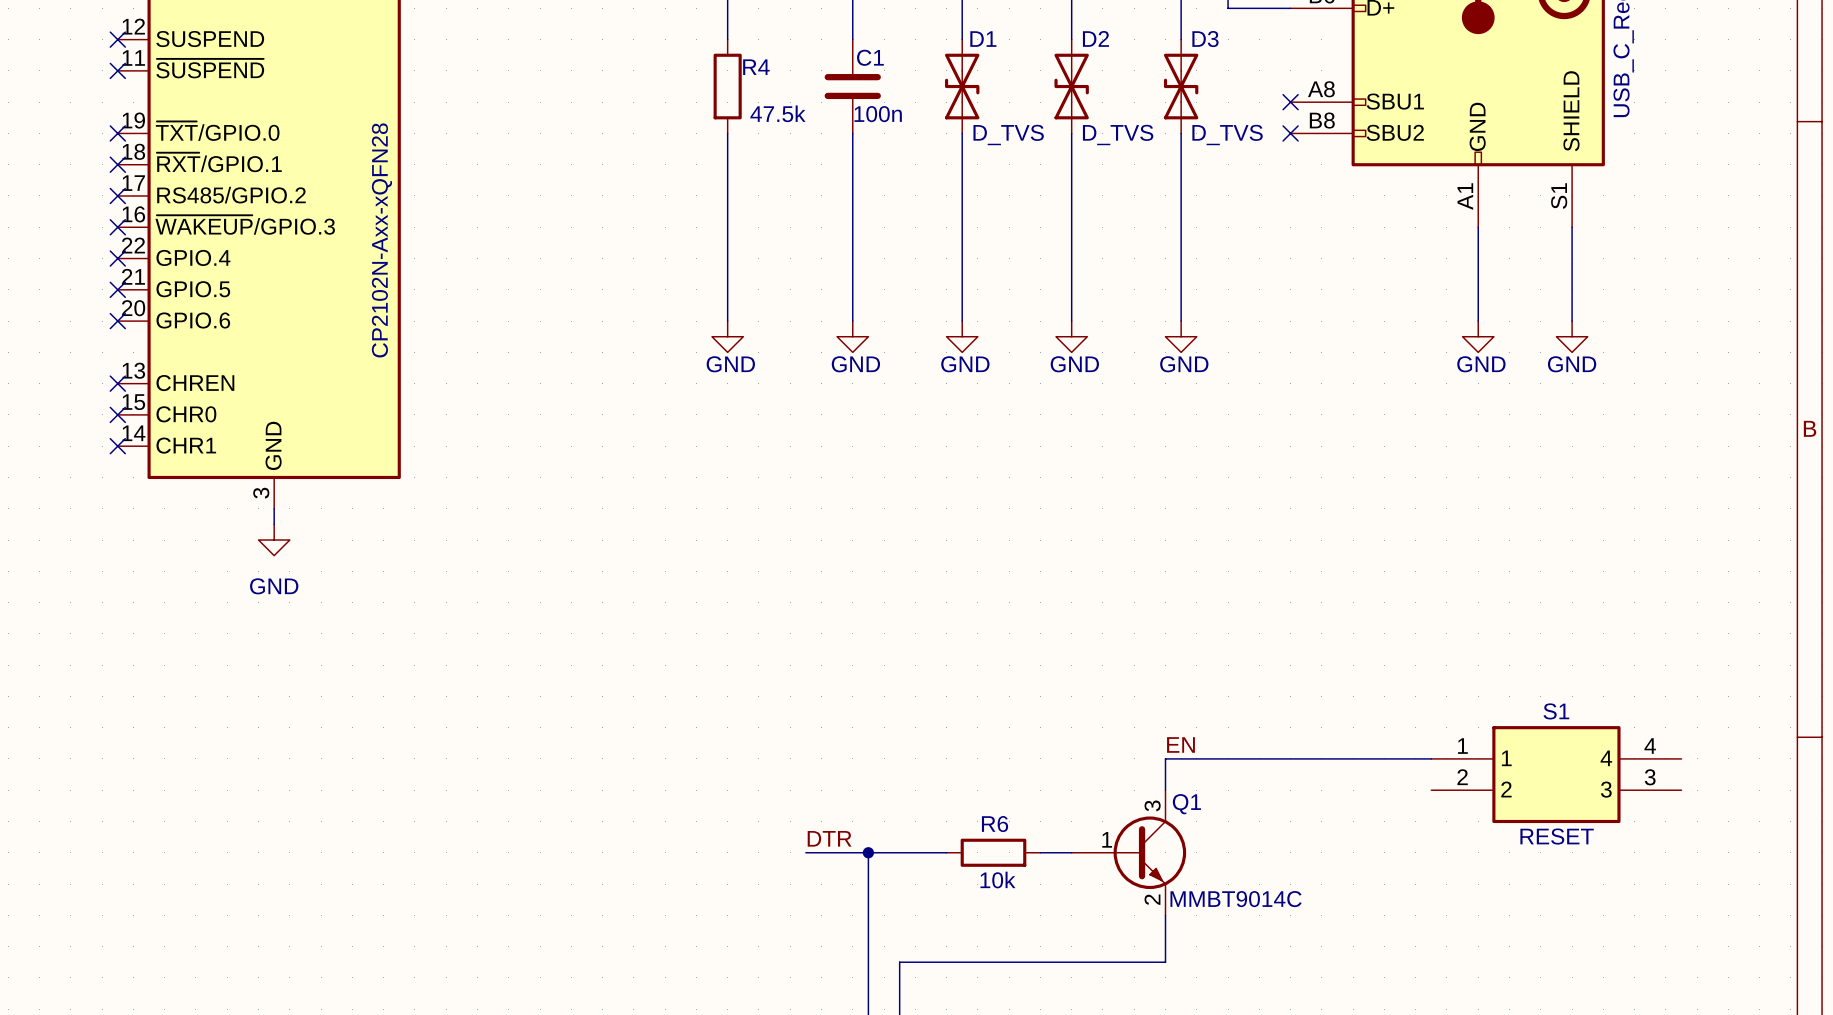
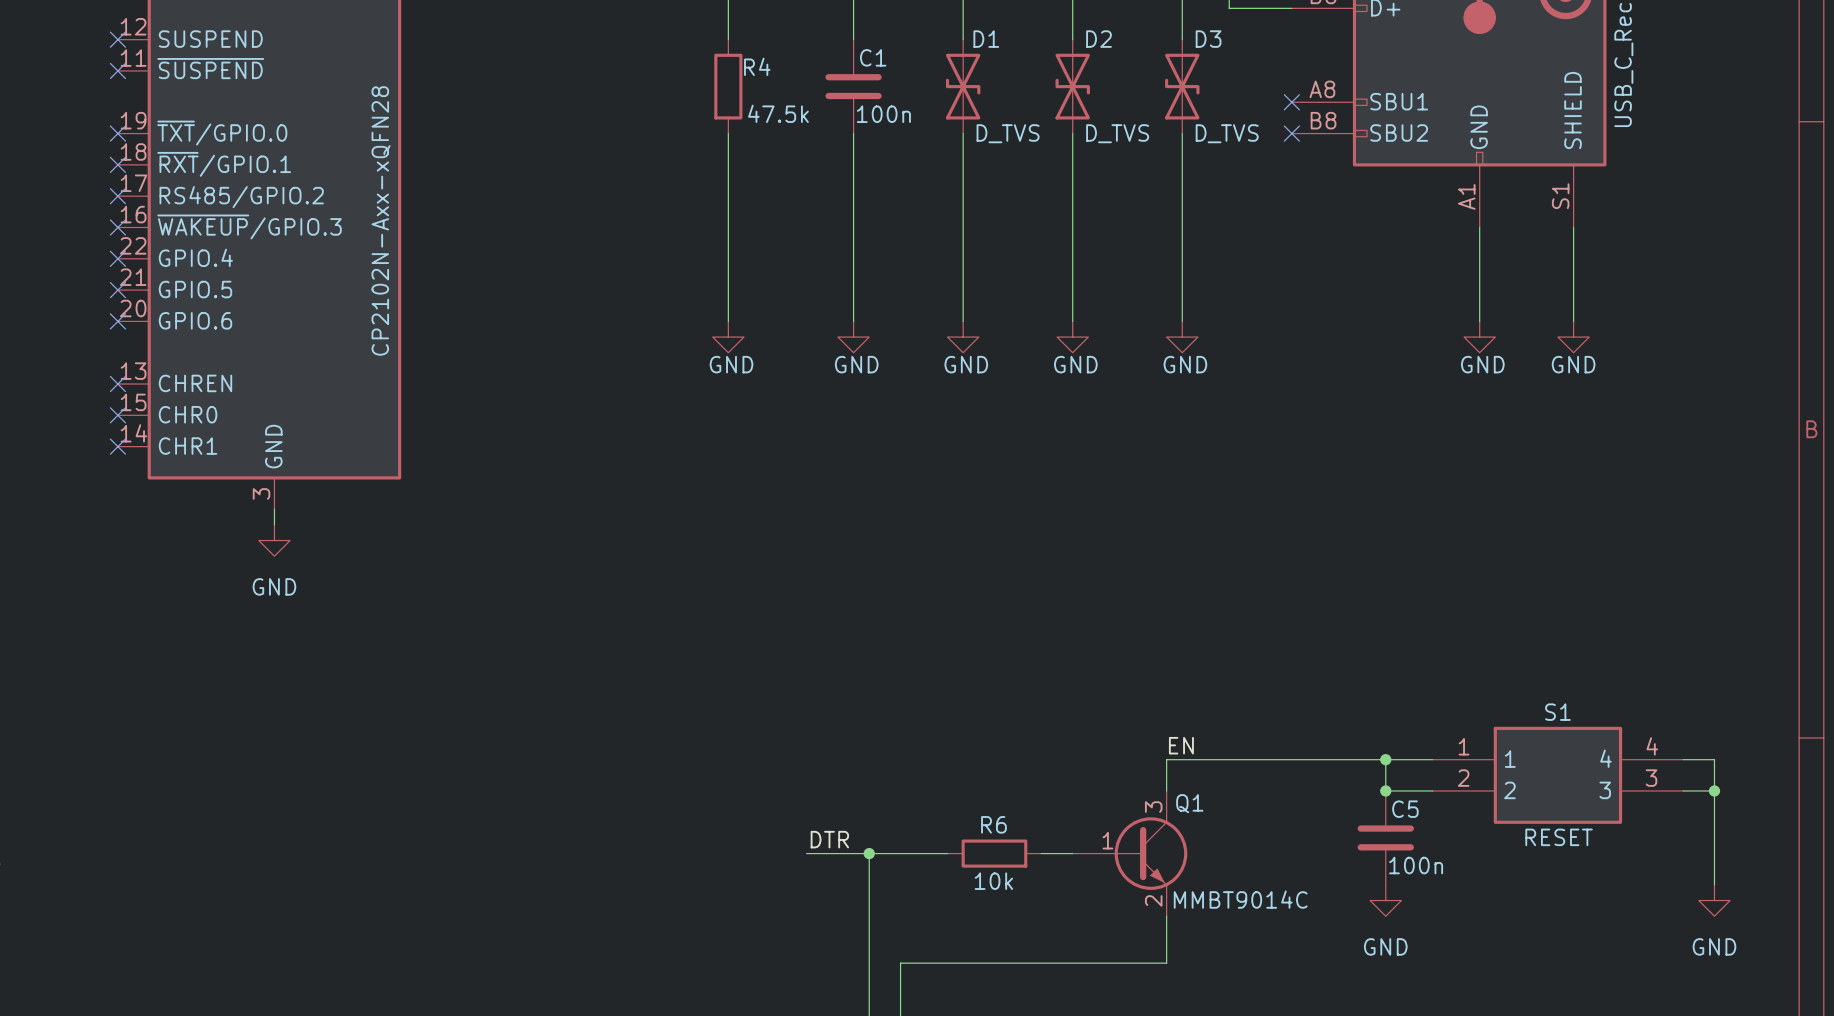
wire: none -> (1385, 759) (1385, 790) (1432, 790)
junction: none -> (1385, 759)
wire: none -> (1683, 759) (1714, 759) (1714, 884)
junction: none -> (1385, 790)
wire: none -> (1683, 790) (1714, 790)
junction: none -> (1714, 790)
C5: none -> 100n (1385, 837)
power symbol: none -> GND (1385, 900)
power symbol: none -> GND (1714, 900)

